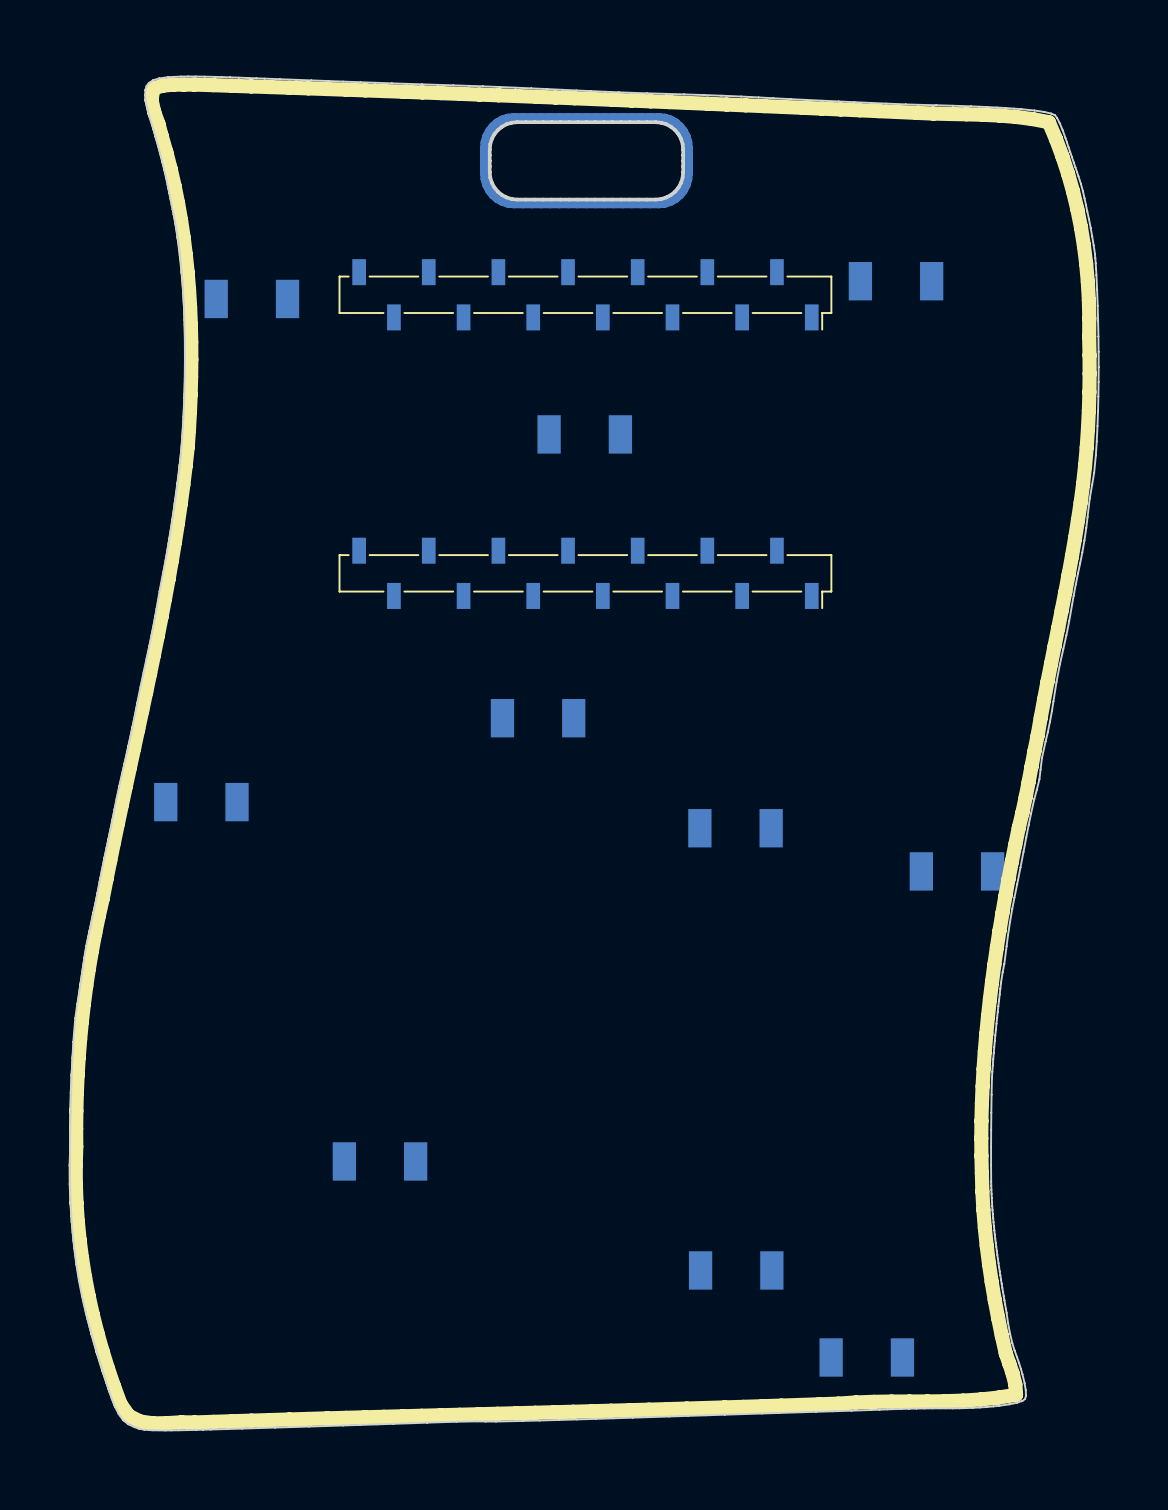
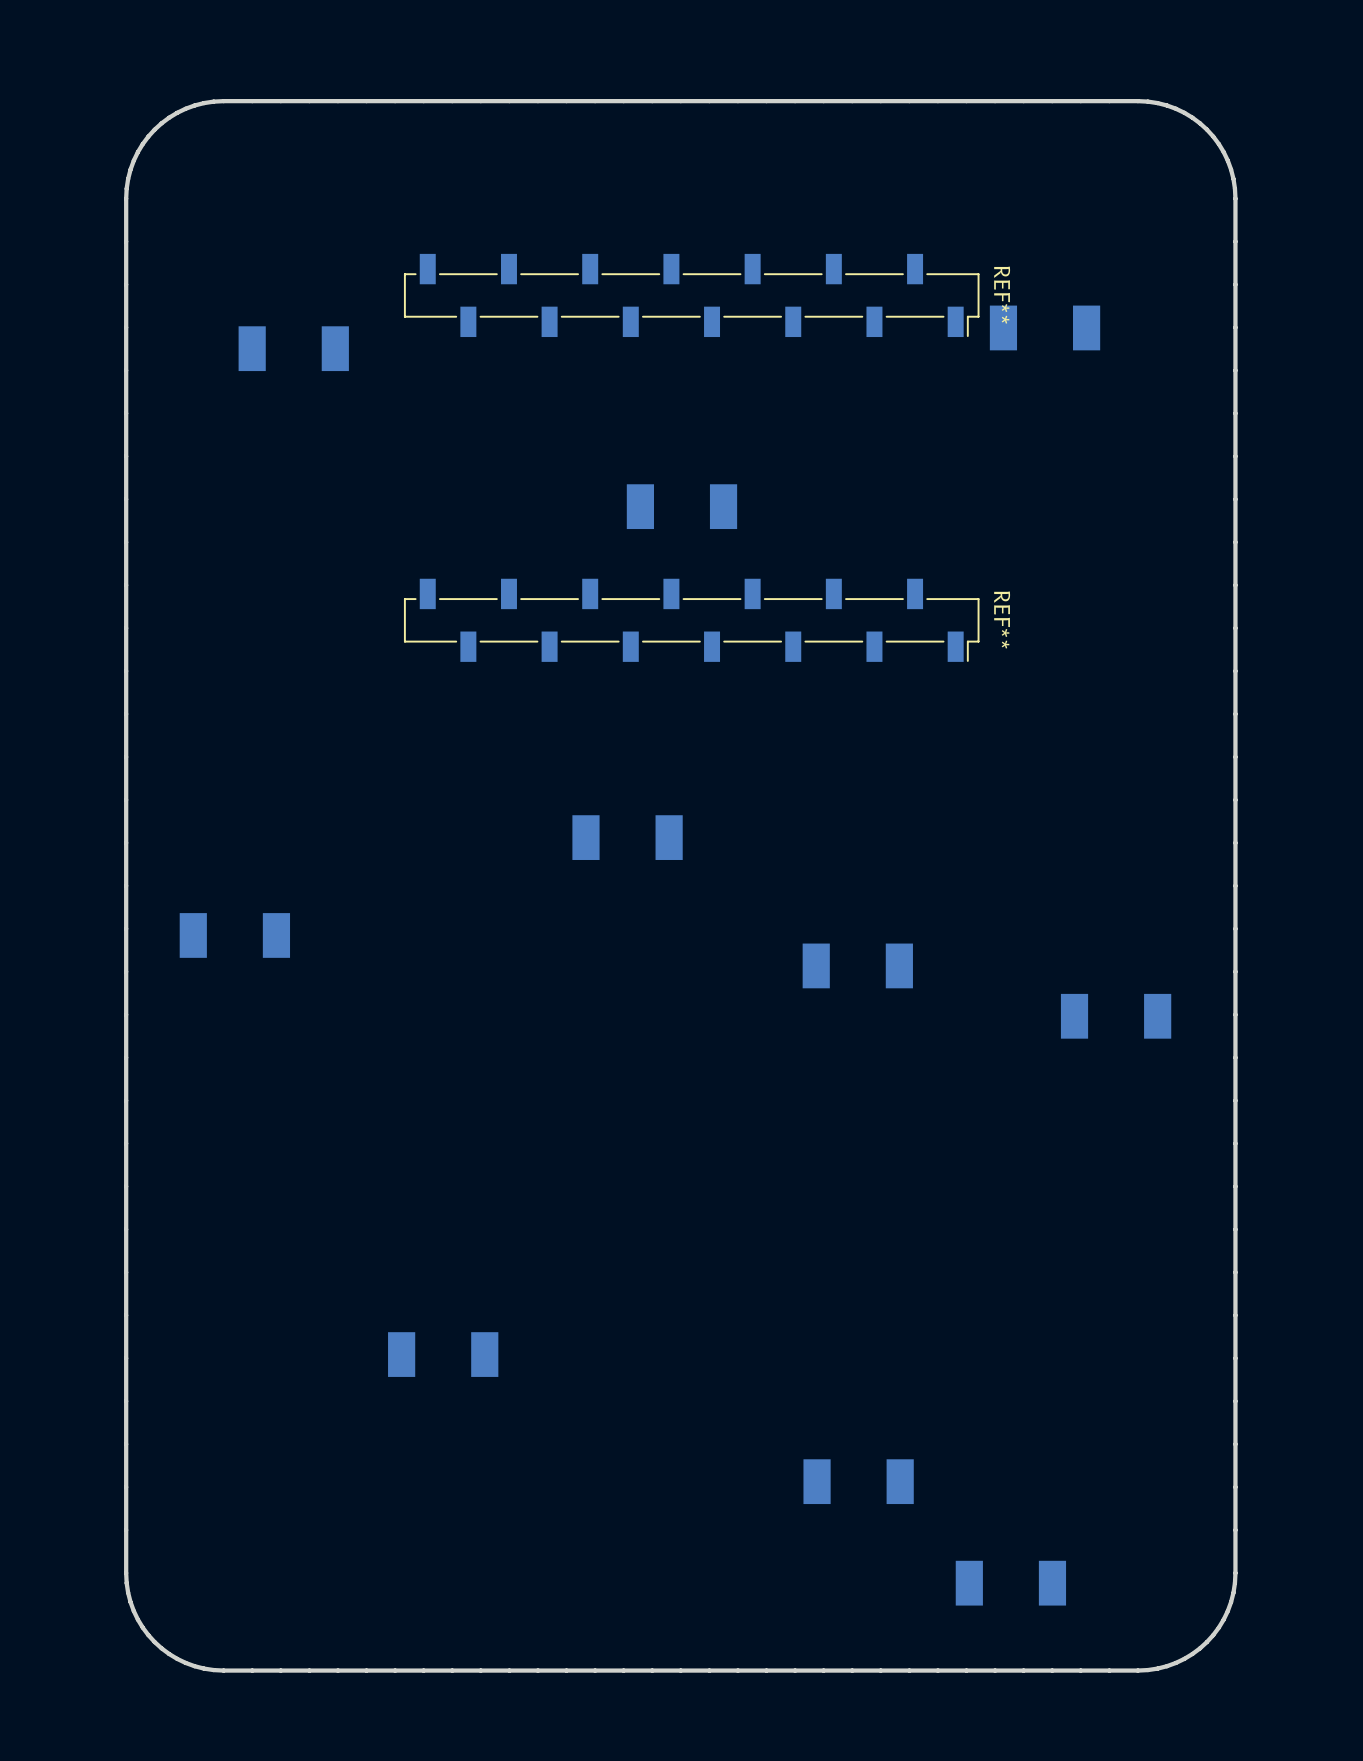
drawing: [68, 75, 1100, 1432] -> none
drawing: none -> [124, 98, 1238, 1673]
REF**: none -> (691, 295)
part: (585, 294) -> none
REF**: none -> (691, 620)
part: (585, 573) -> none

